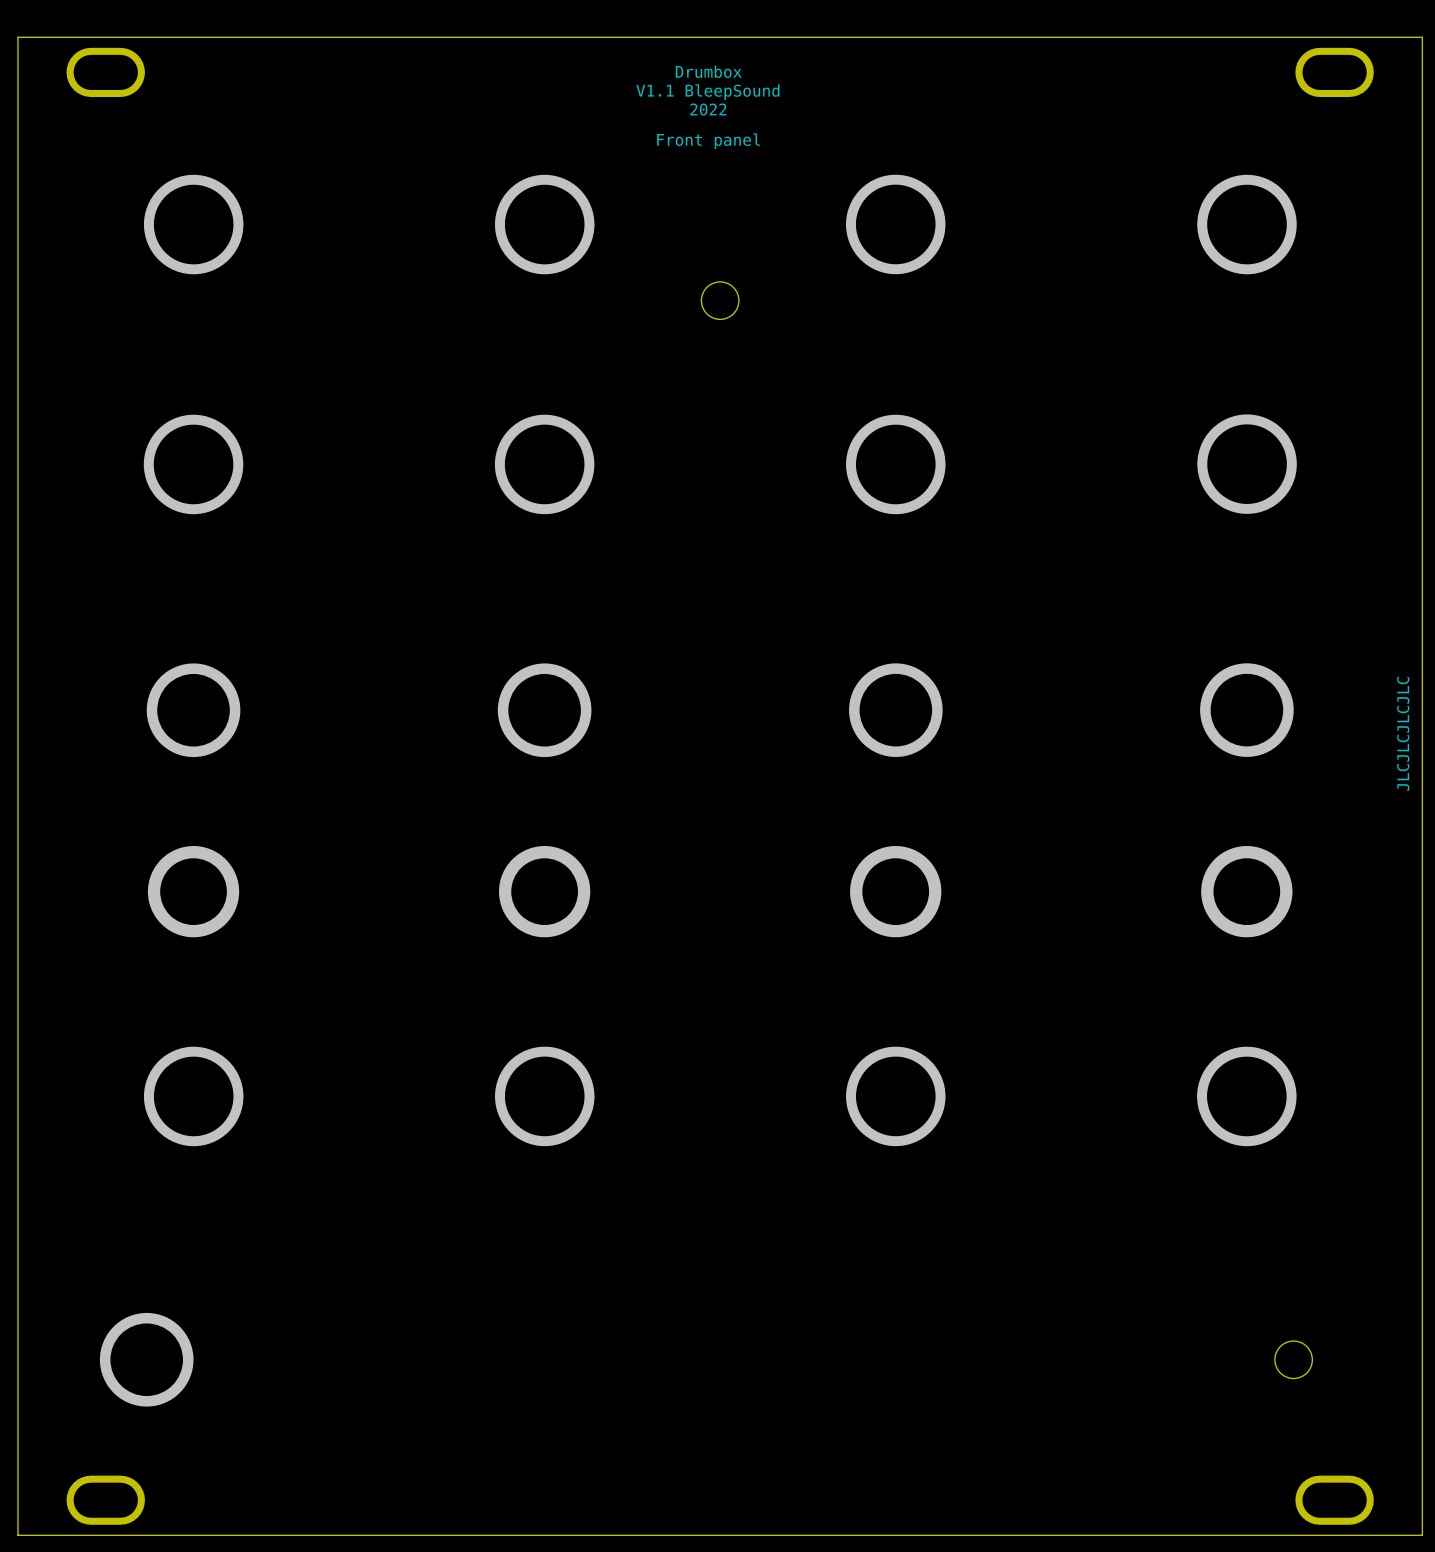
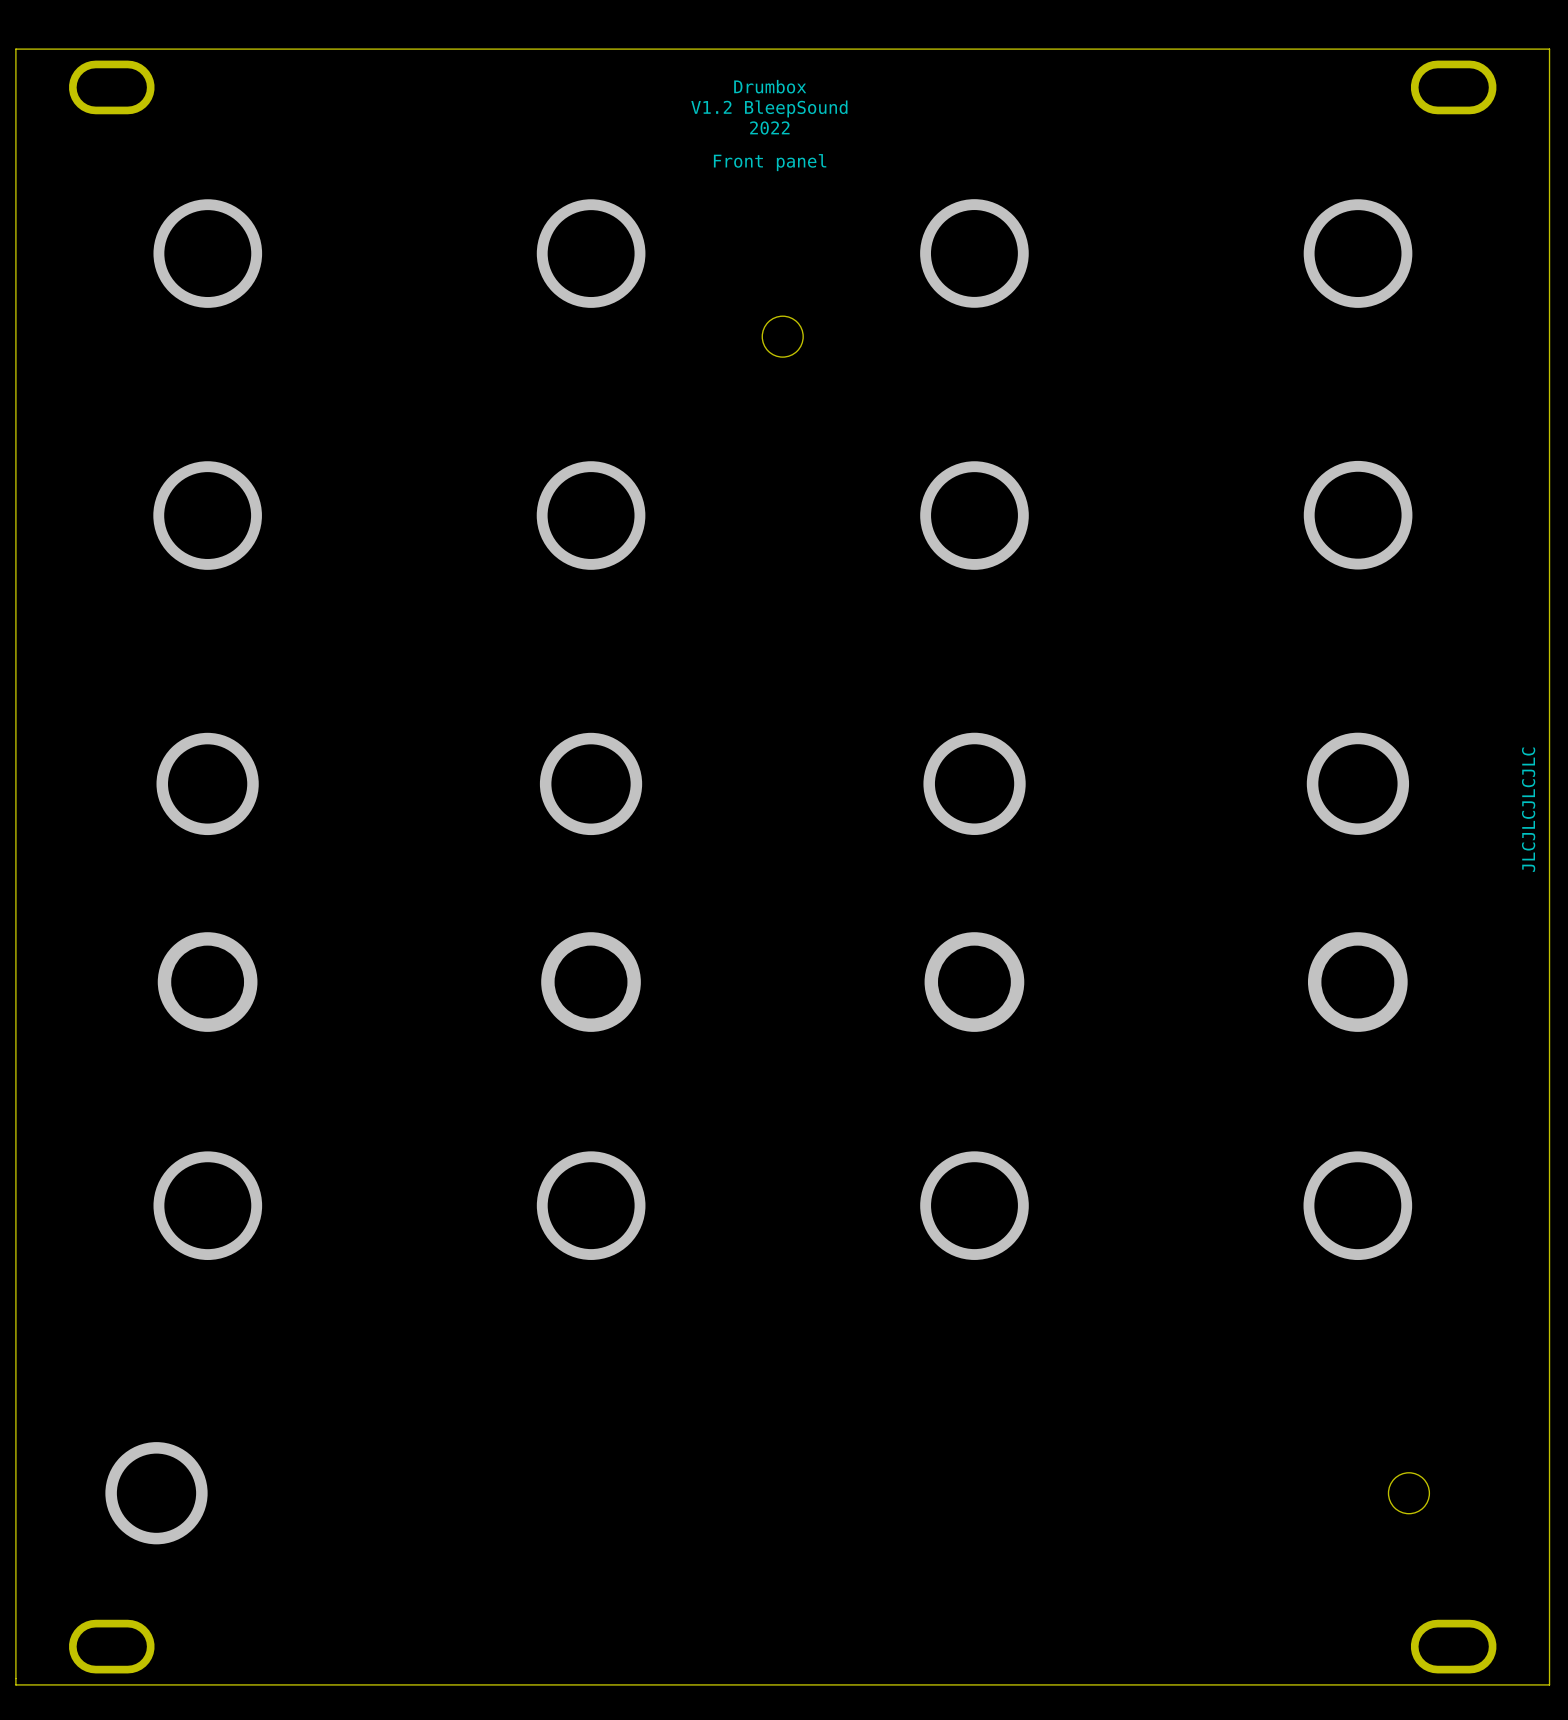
text: V1.1 BleepSound (707, 92) -> V1.2 BleepSound (769, 108)

